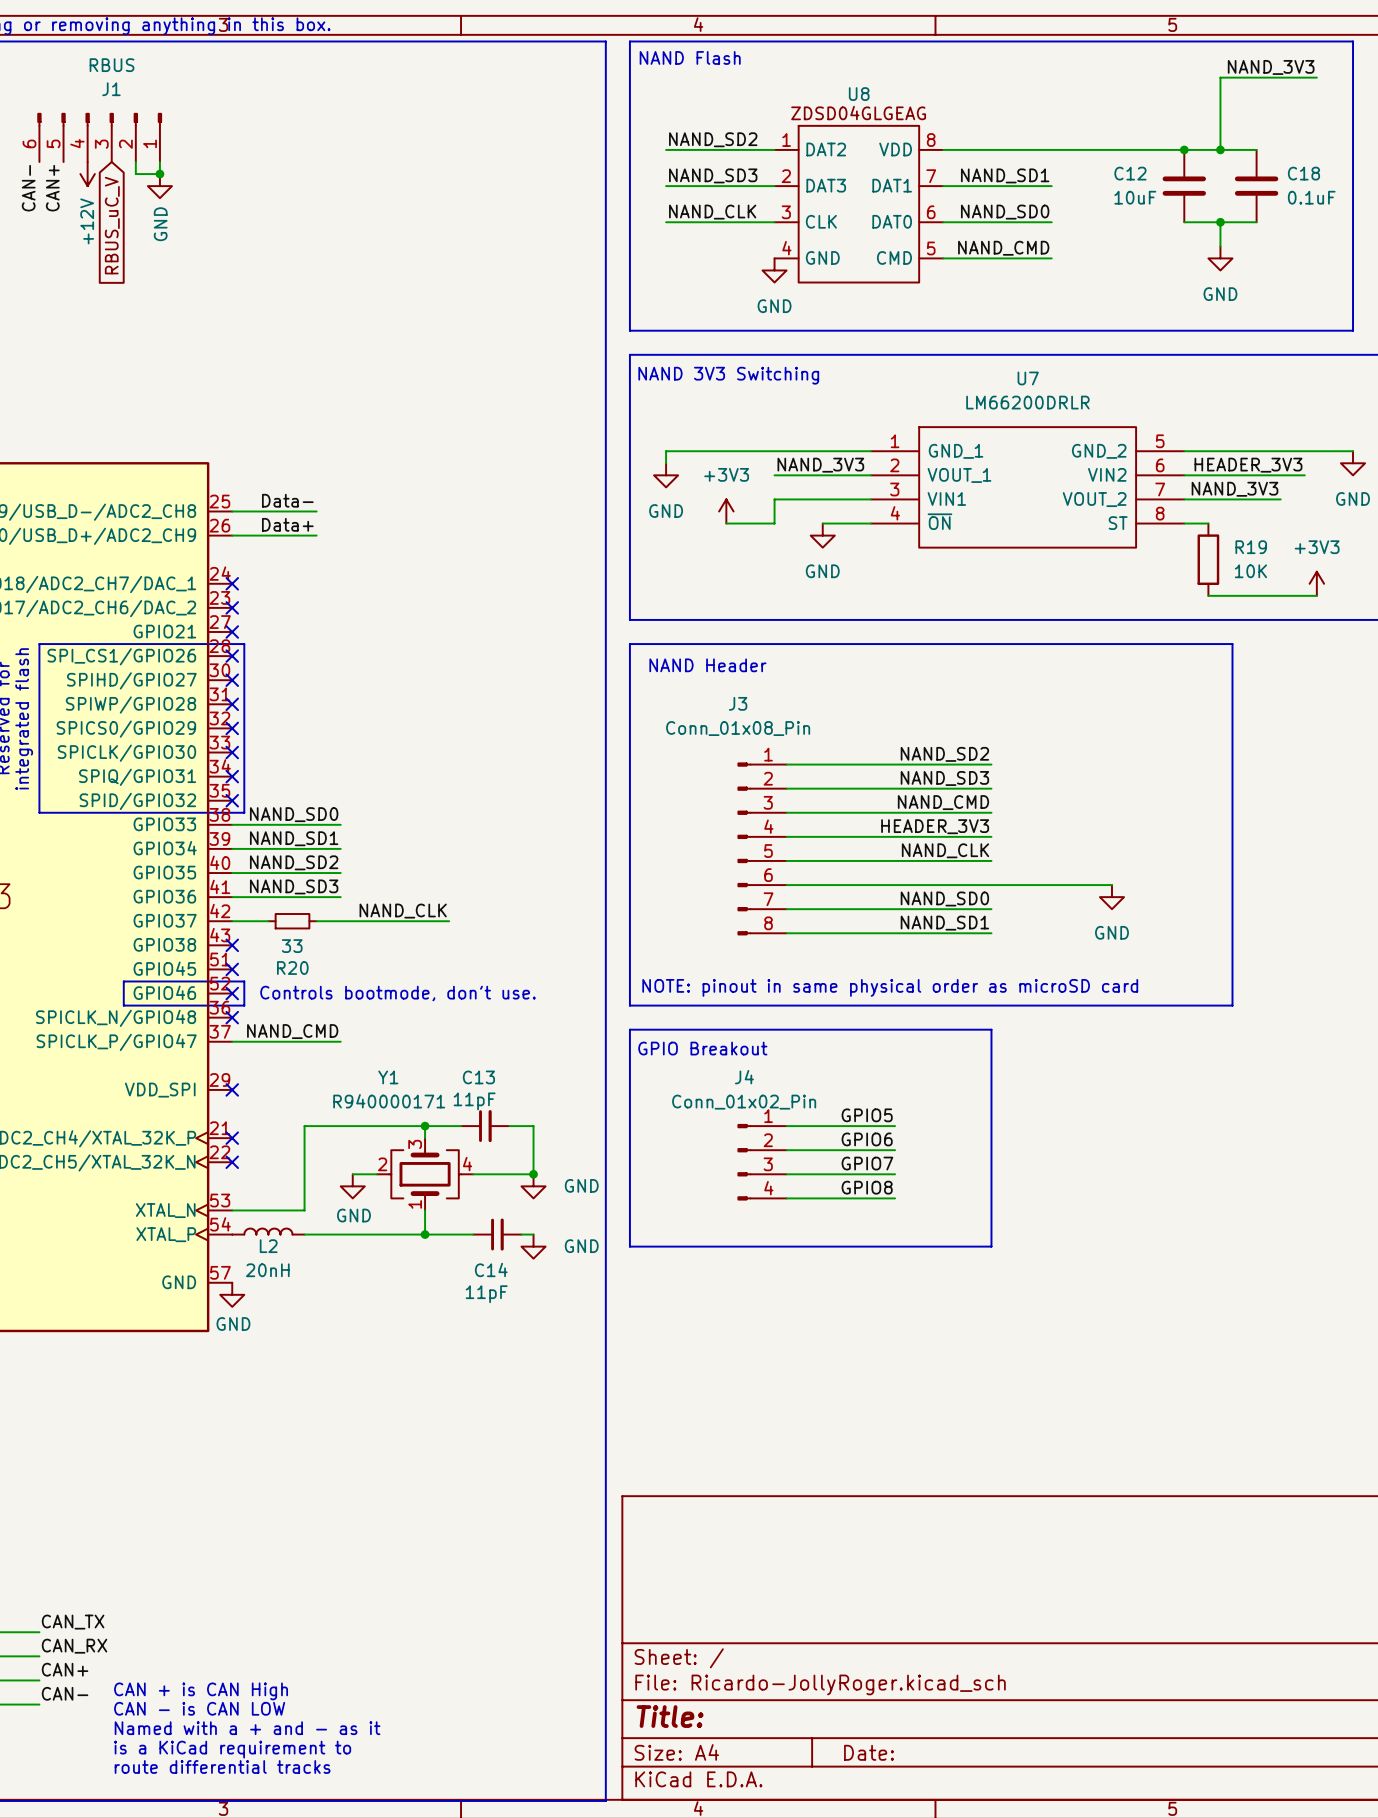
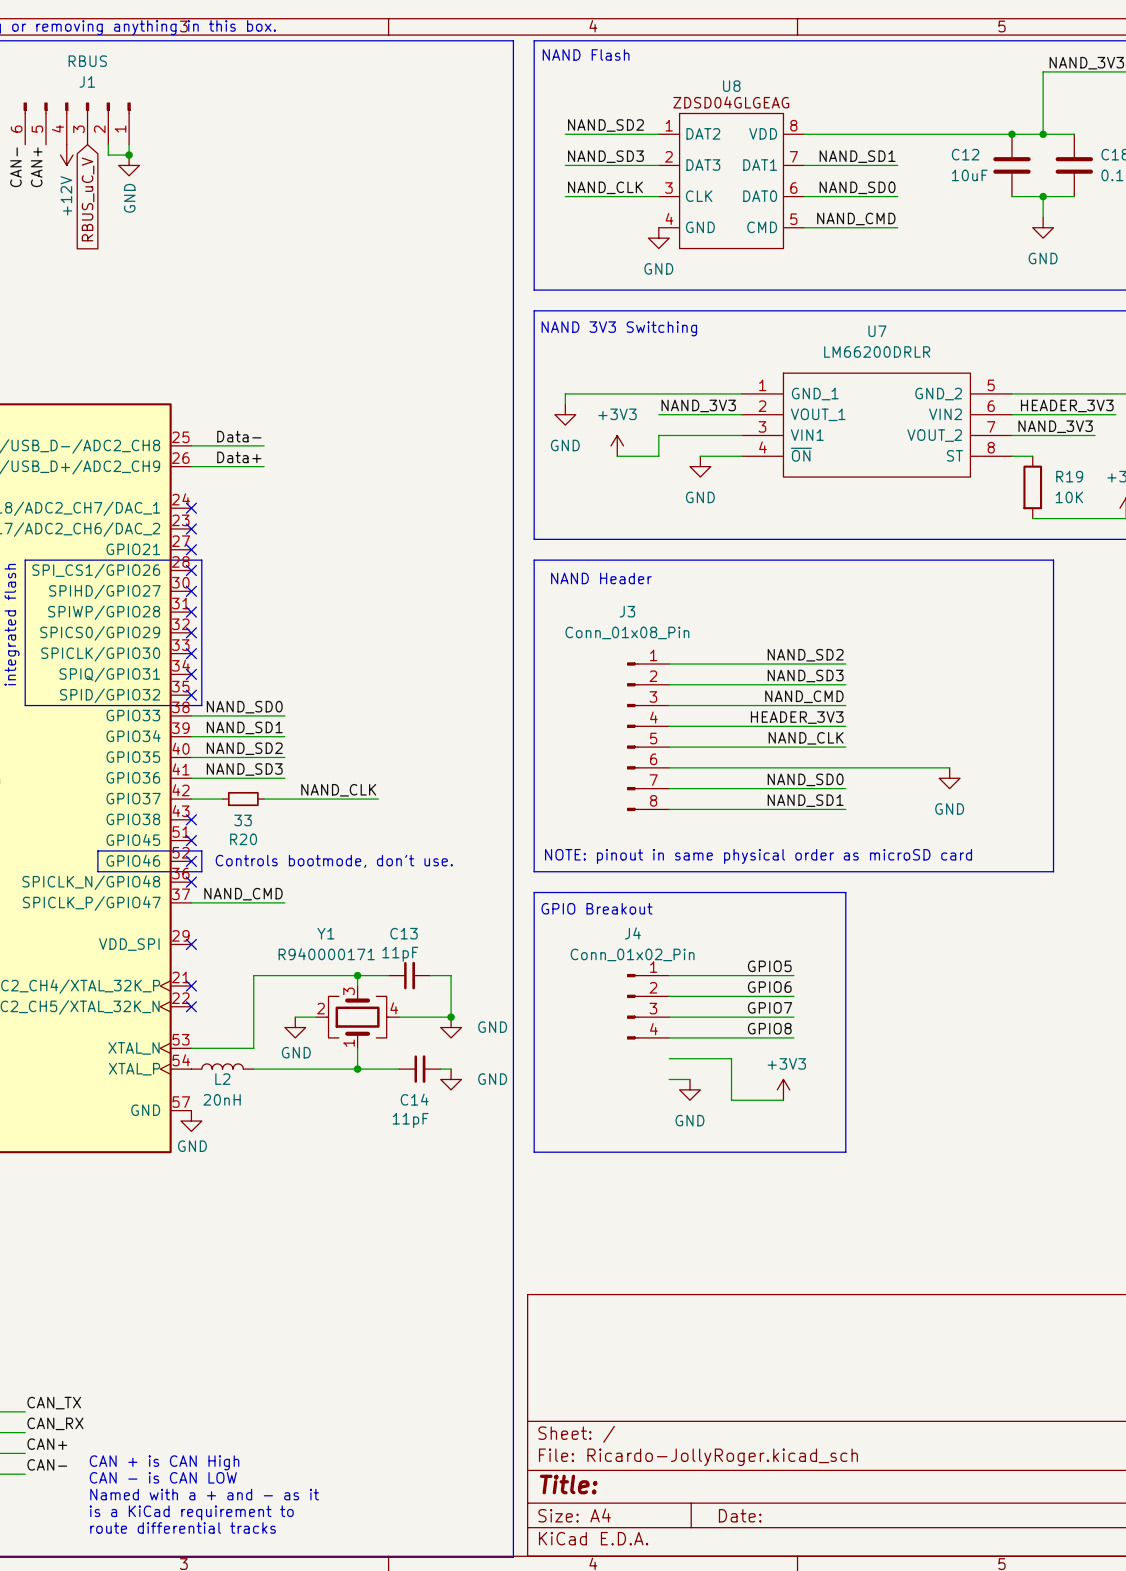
label position: GPIO5 (867, 1115) -> GPIO5 (769, 966)
wire: none -> (762, 975) (793, 975)
label position: GPIO6 (867, 1139) -> GPIO6 (769, 987)
wire: none -> (762, 996) (793, 996)
label position: GPIO7 (867, 1163) -> GPIO7 (770, 1007)
wire: none -> (762, 1017) (793, 1017)
label position: GPIO8 (867, 1187) -> GPIO8 (769, 1028)
wire: none -> (762, 1037) (793, 1037)
wire: none -> (669, 1058) (731, 1058) (731, 1100) (783, 1100)
line: (629, 1246) (991, 1246) -> (534, 1079) (534, 1152) (845, 1152) (845, 1079)
power symbol: none -> GND (689, 1089)
power symbol: none -> +3V3 (783, 1089)

